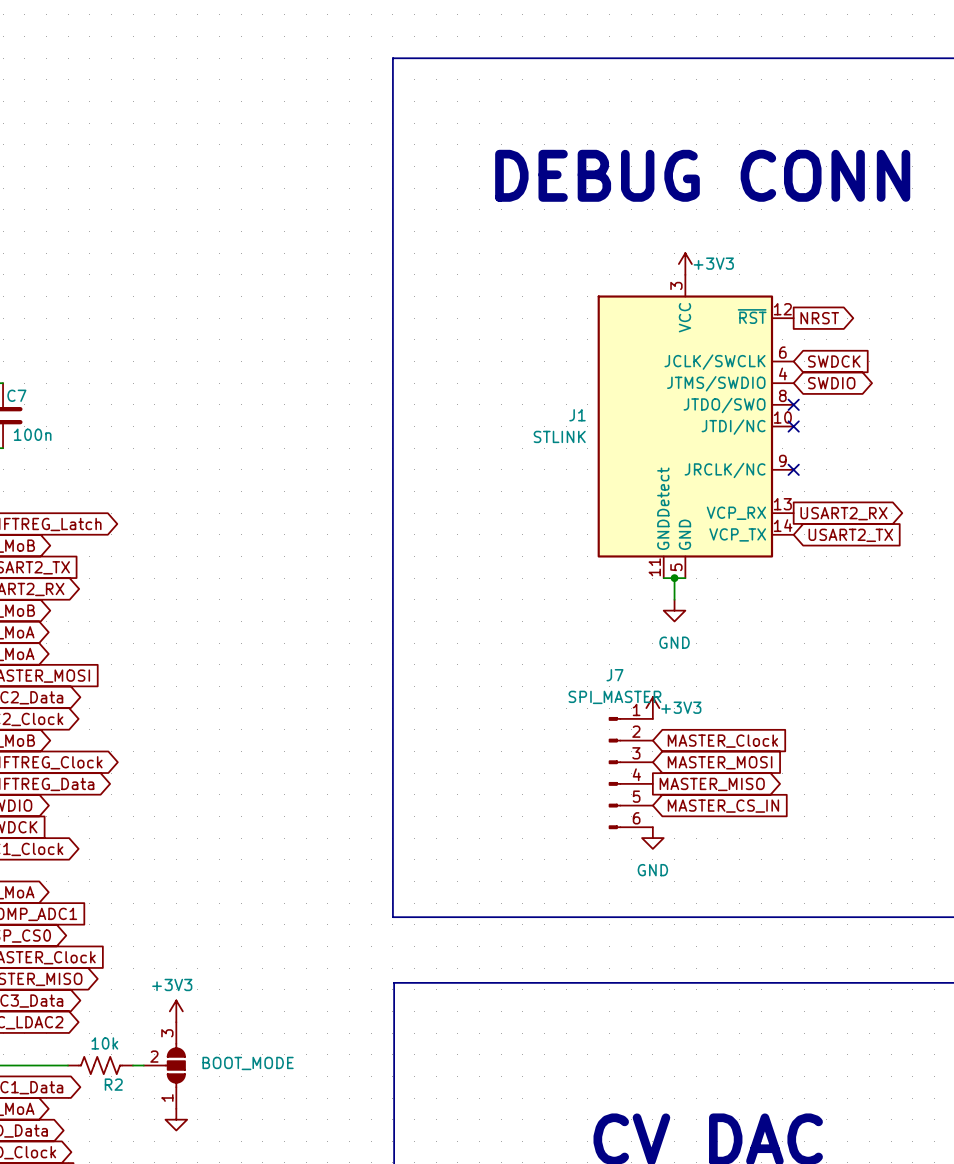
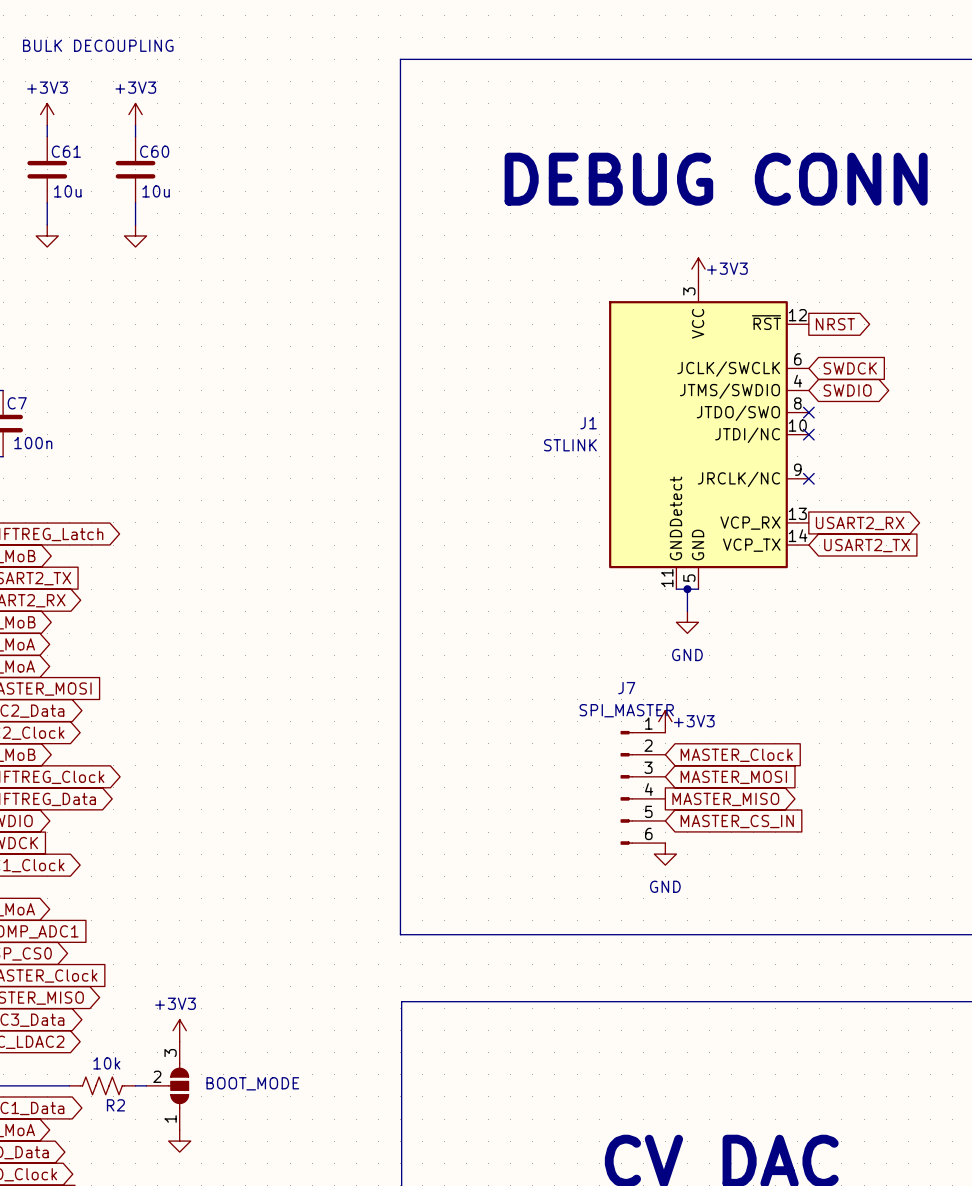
text: none -> BULK DECOUPLING (98, 45)
power symbol: none -> +3V3 (47, 114)
power symbol: none -> +3V3 (135, 114)
wire: none -> (47, 125) (47, 136)
wire: none -> (135, 125) (135, 136)
C61: none -> 10u (47, 169)
C60: none -> 10u (135, 169)
wire: none -> (47, 202) (47, 224)
wire: none -> (135, 202) (135, 224)
power symbol: none -> (47, 235)
power symbol: none -> (135, 235)

